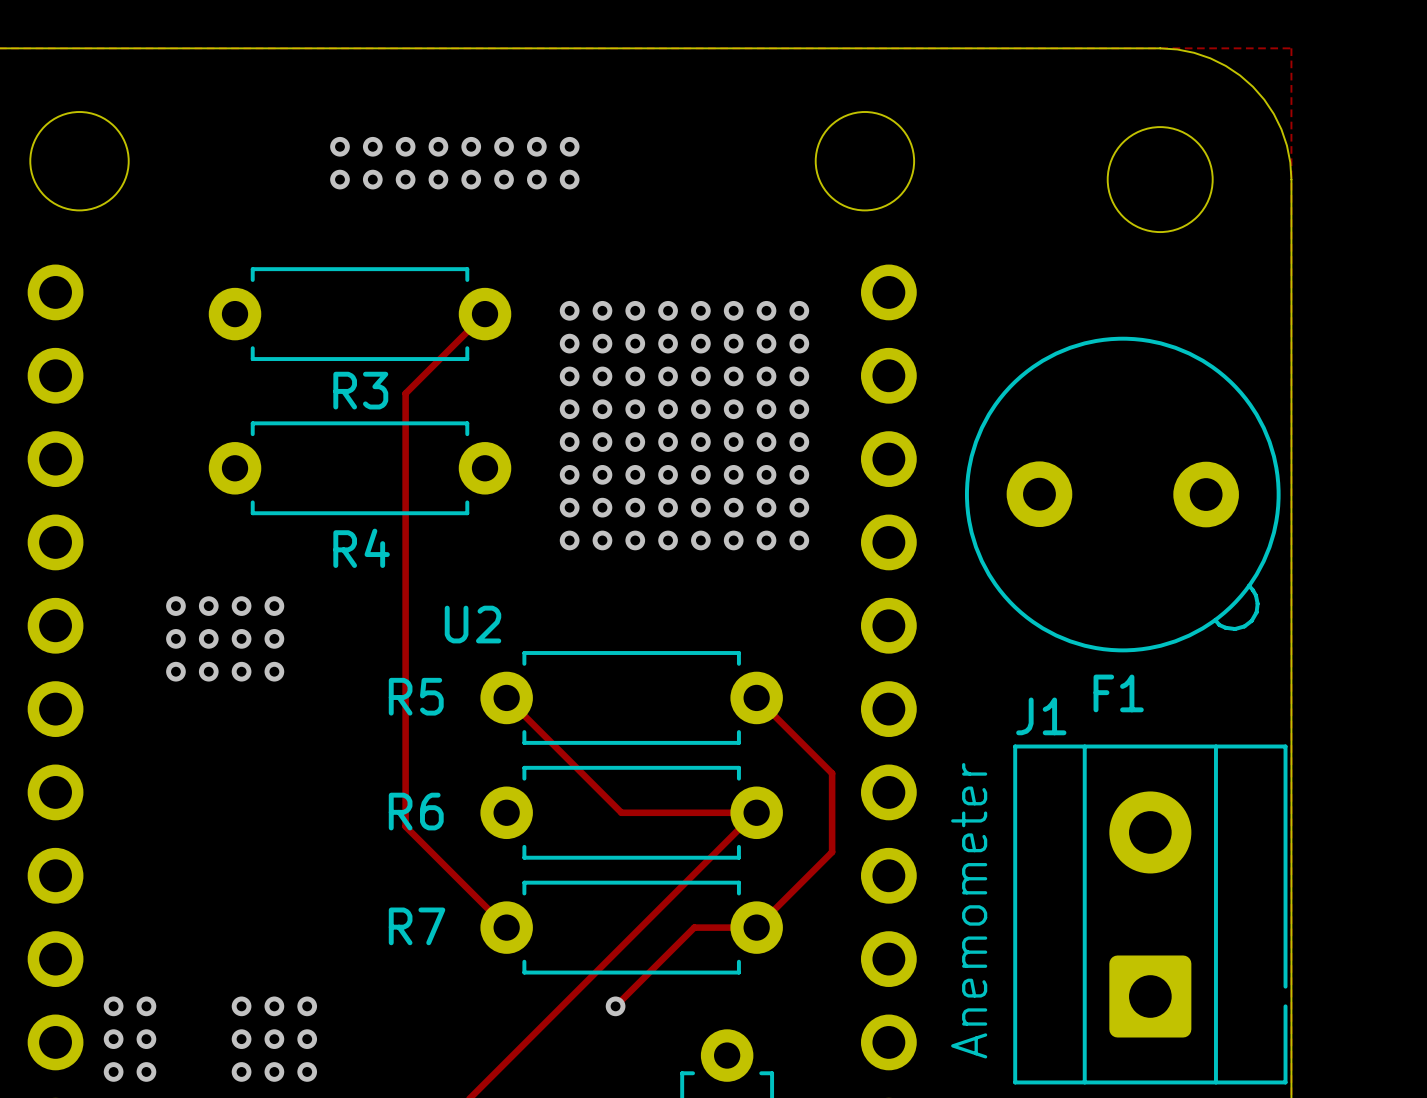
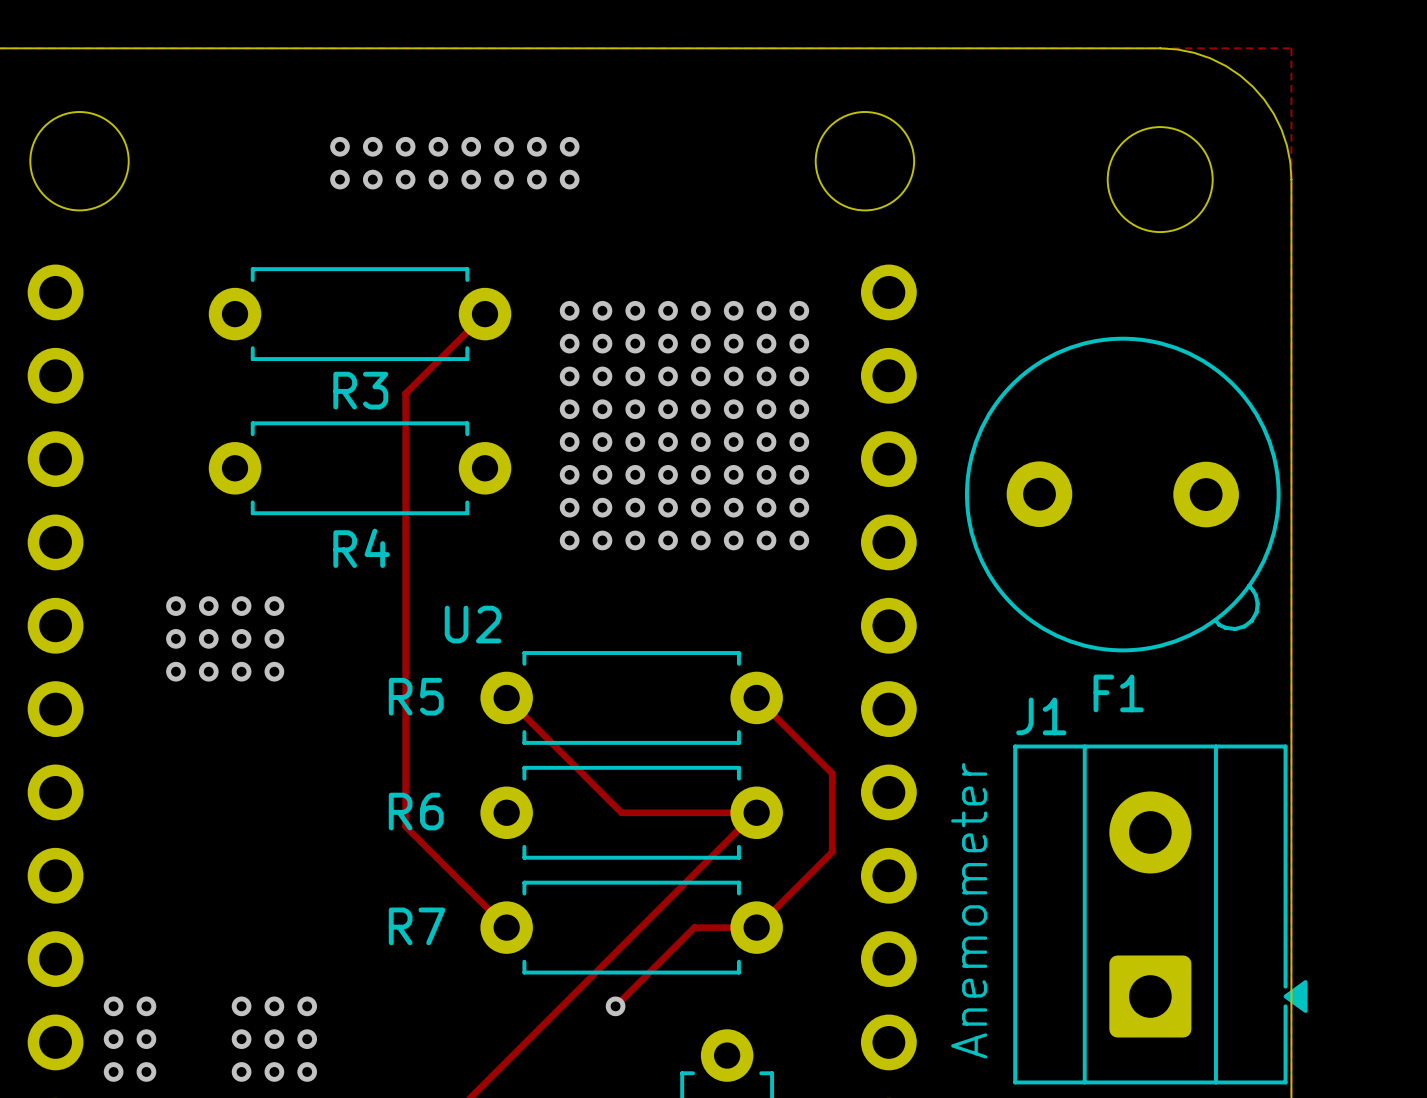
J1 footprint: [1013, 744, 1288, 1085] -> [1013, 744, 1308, 1085]

